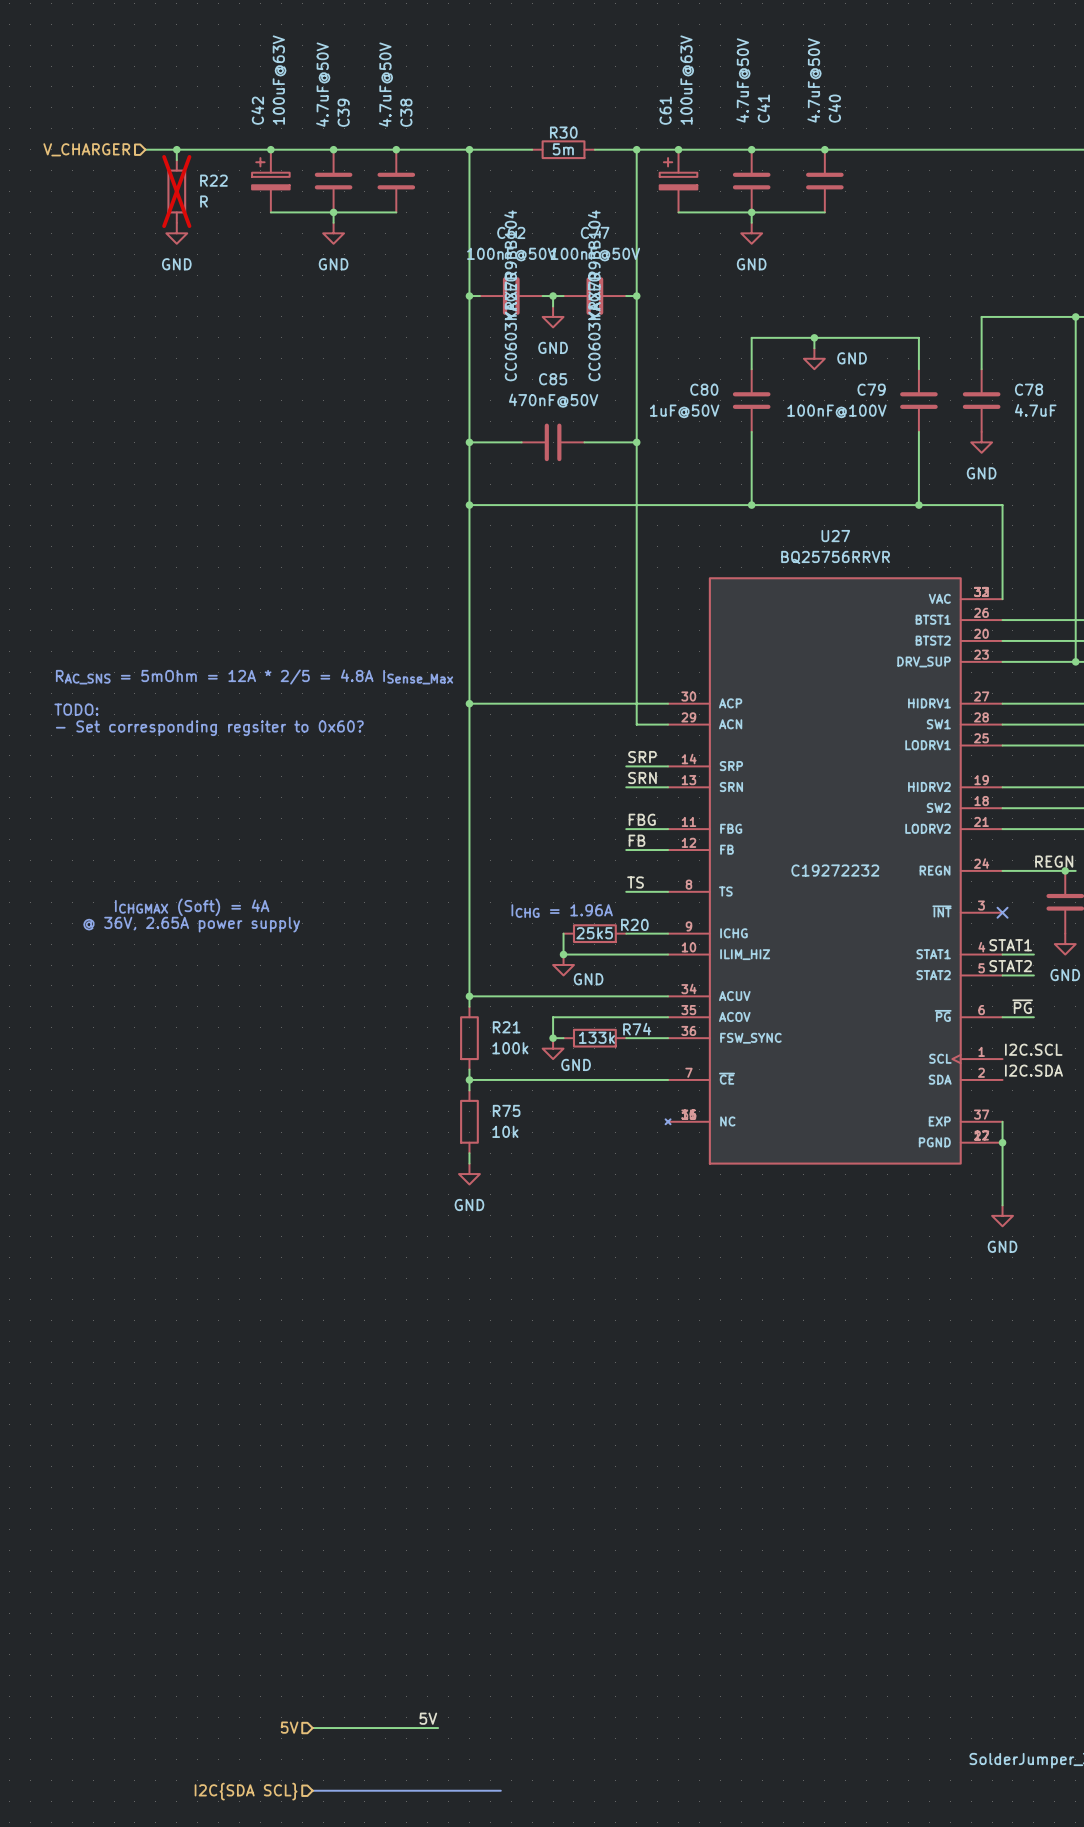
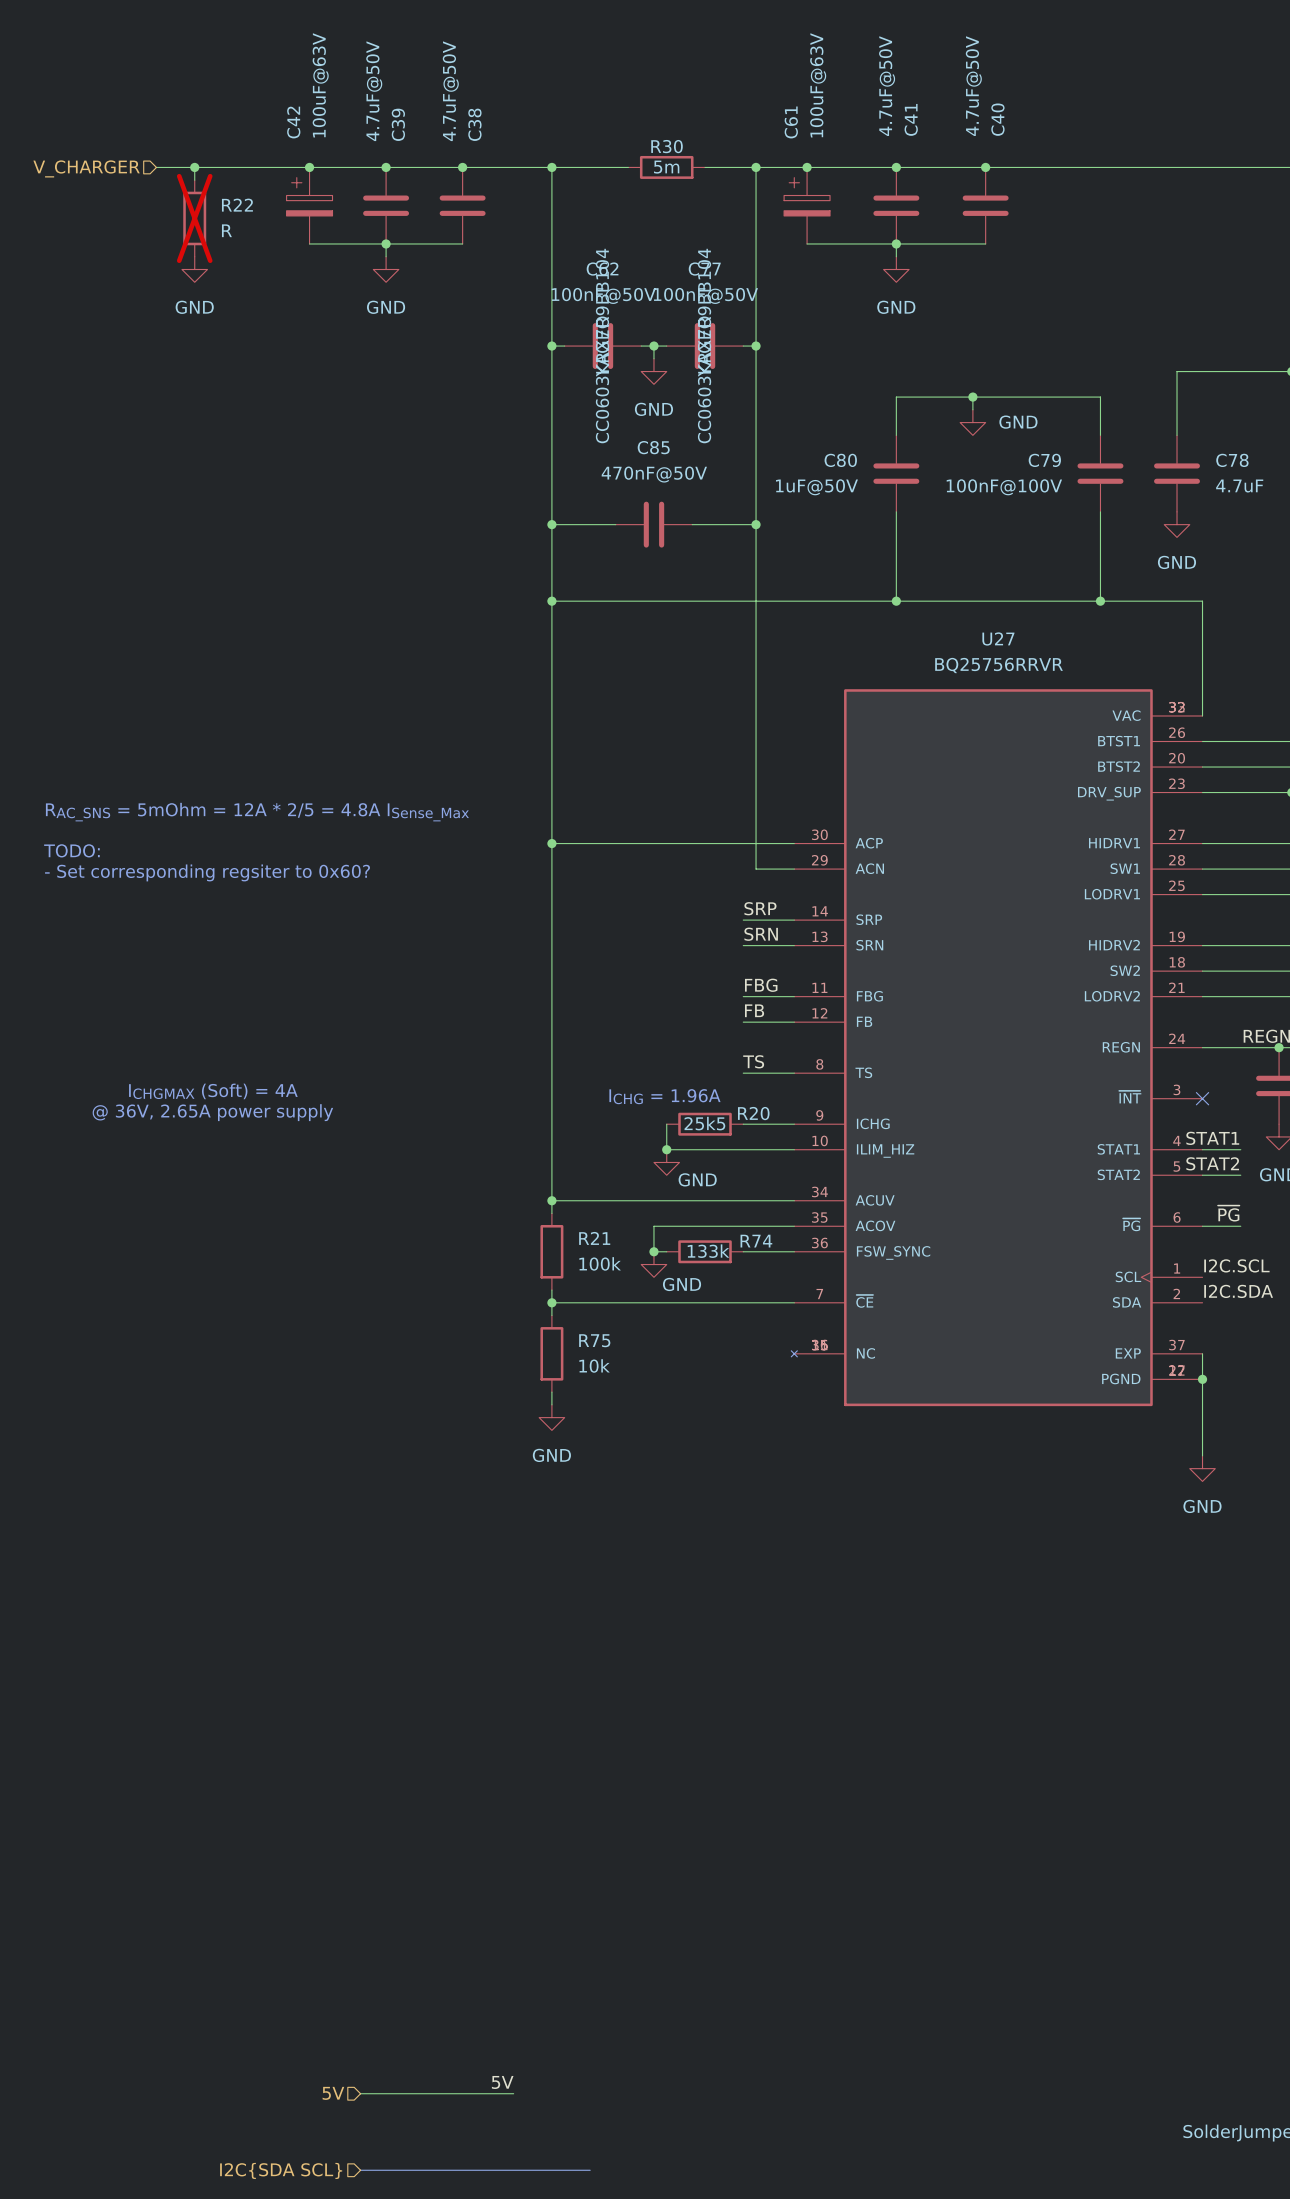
U27 text: C19272232 (835, 870) -> none

